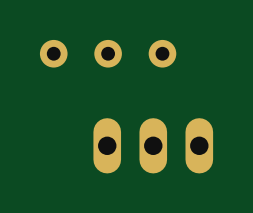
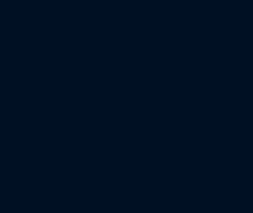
part: (108, 53) -> none
part: (153, 145) -> none

